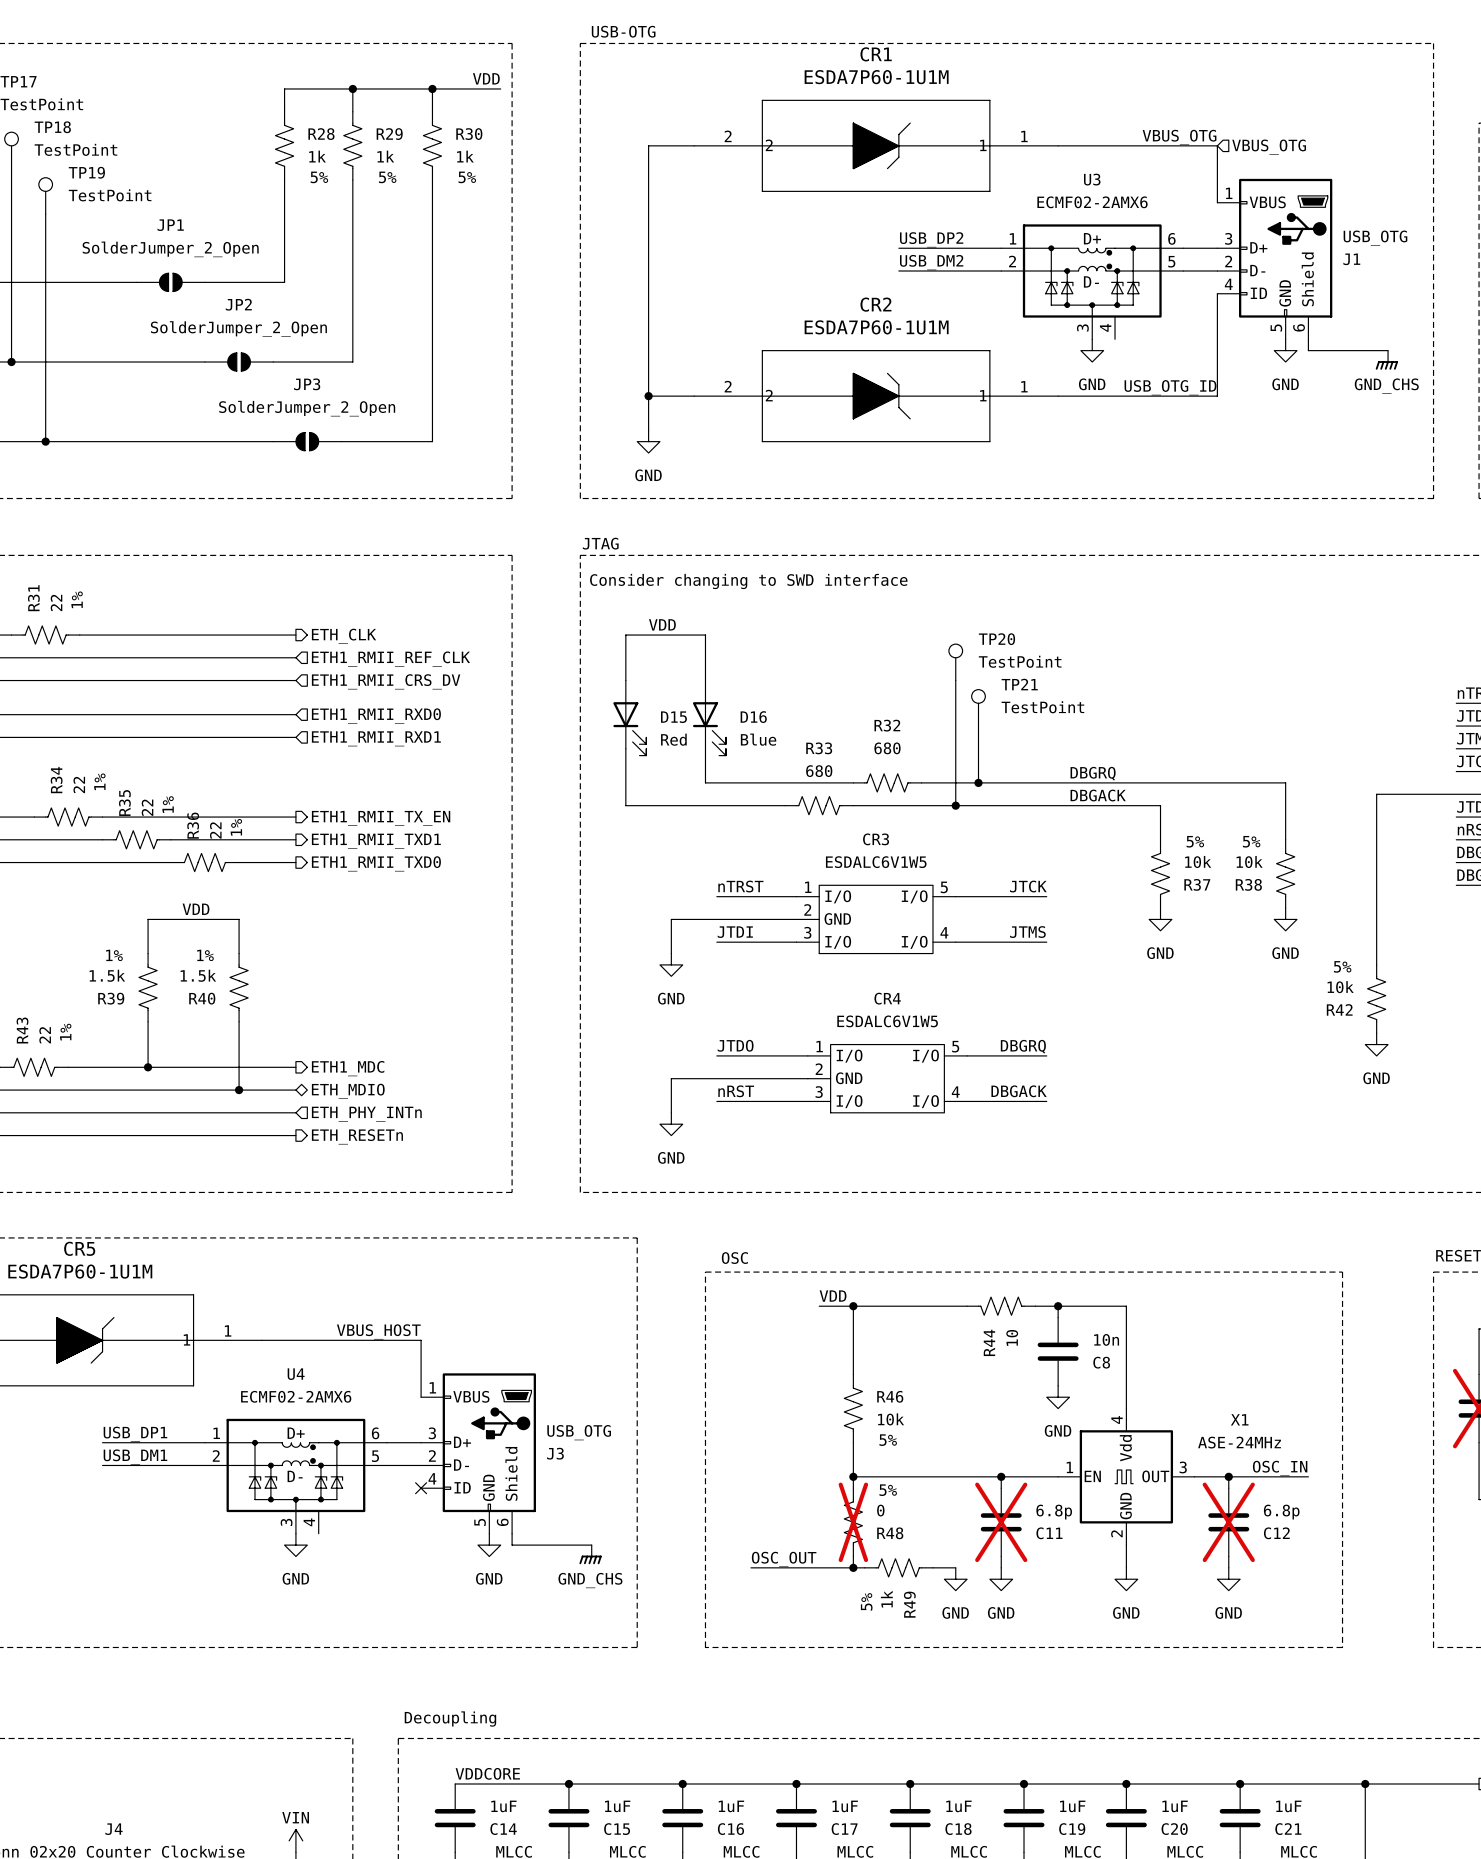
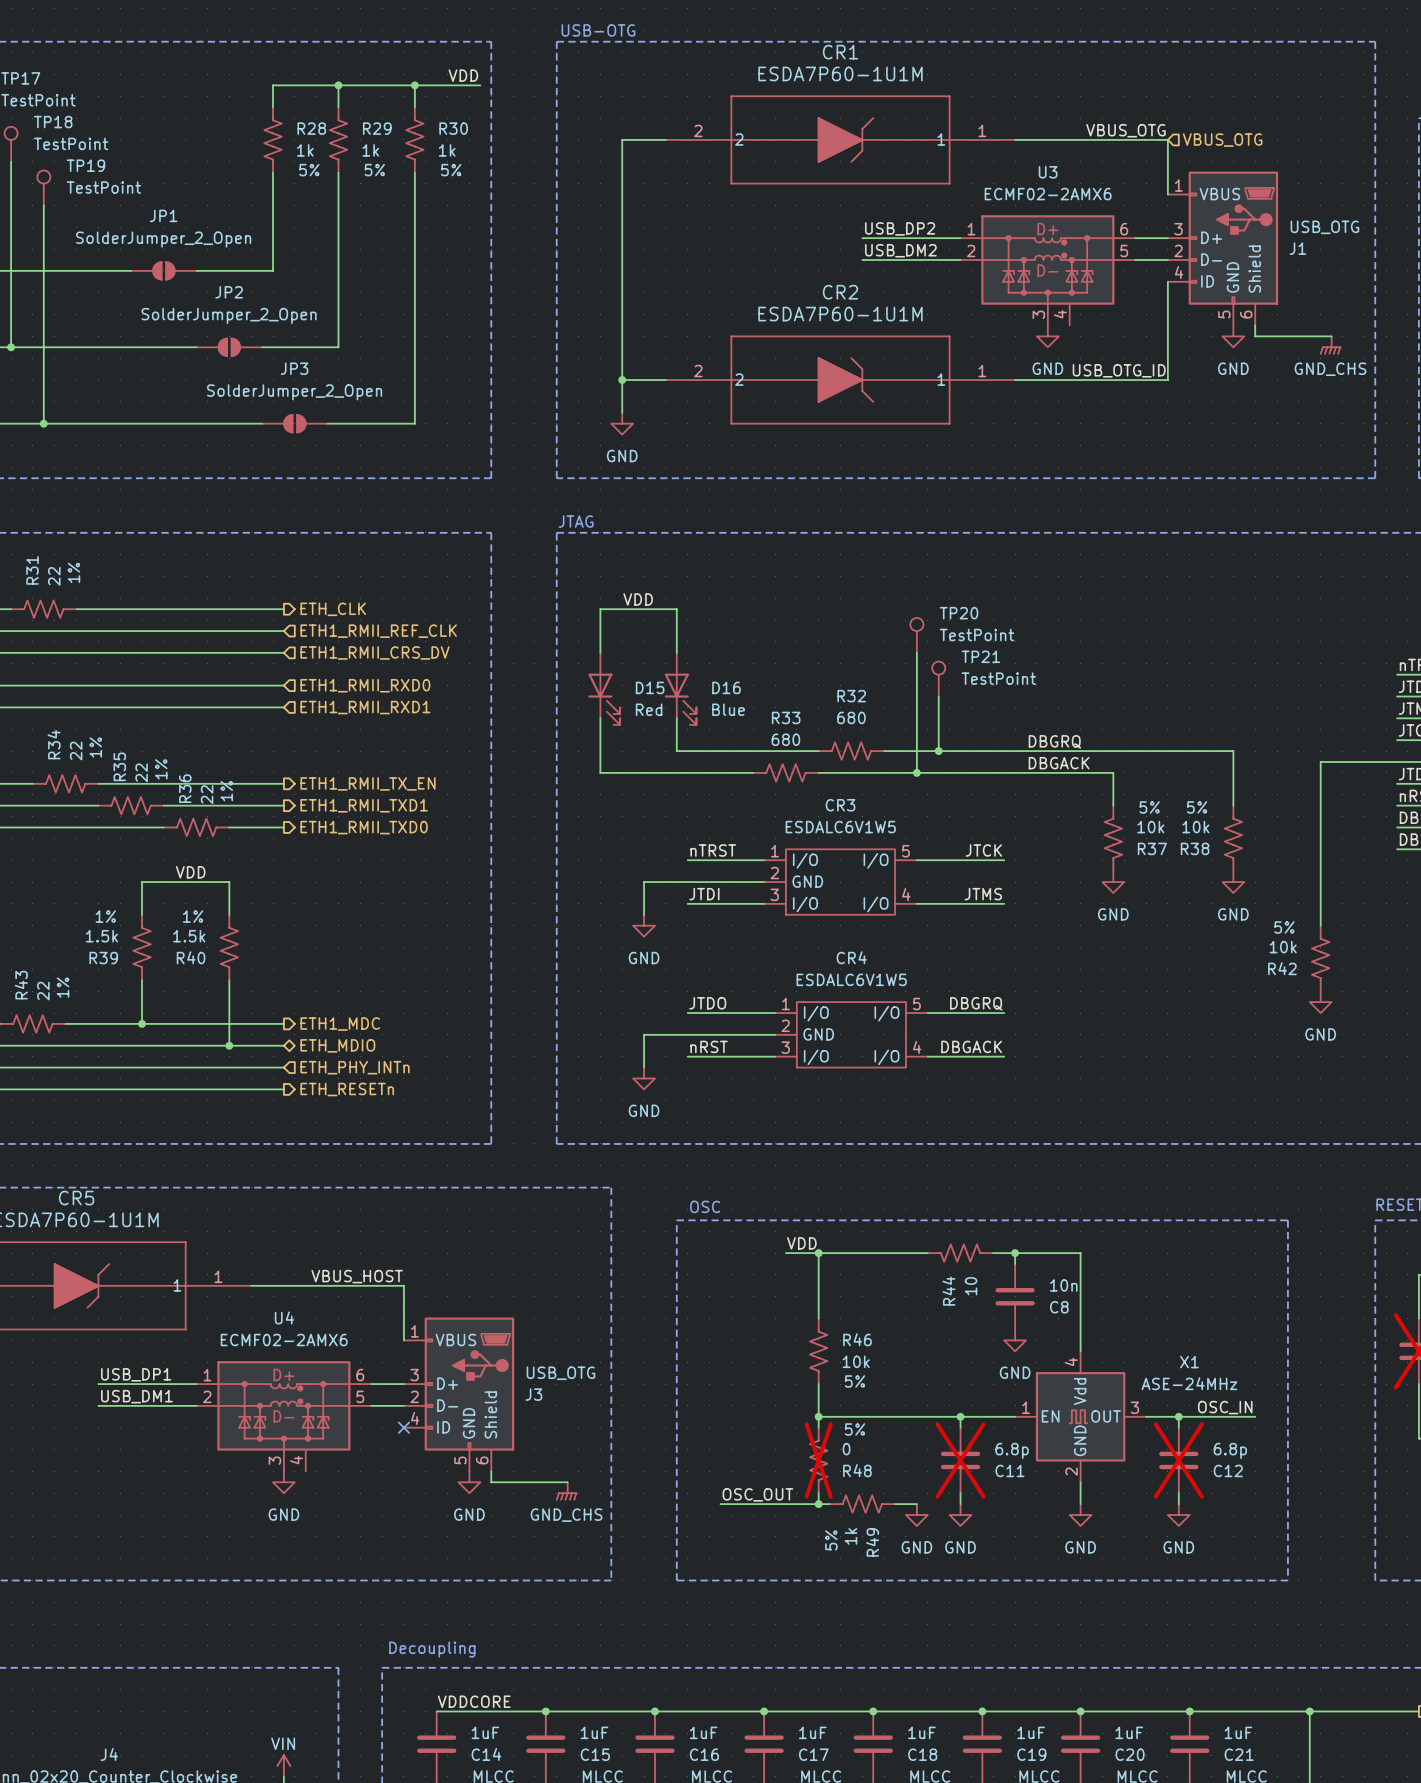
text: Consider changing to SWD interface (748, 581) -> none

